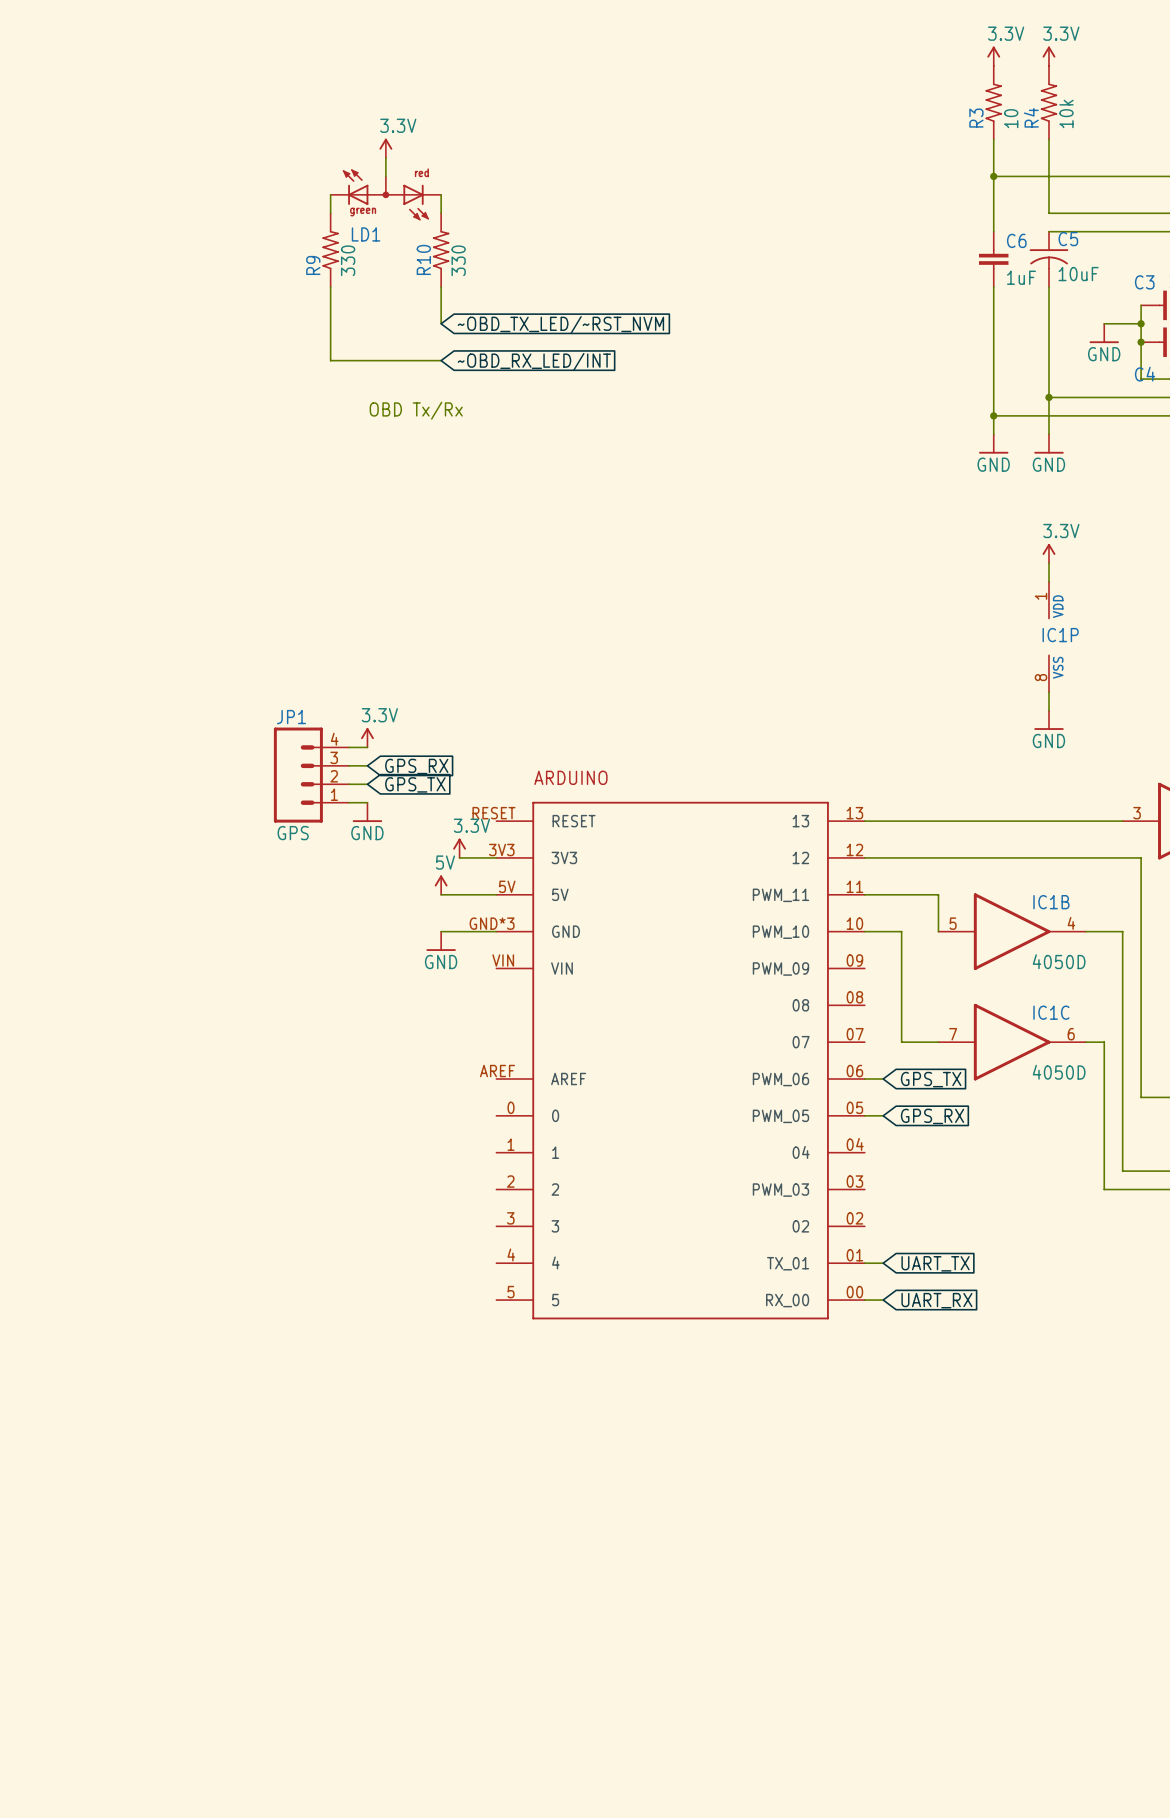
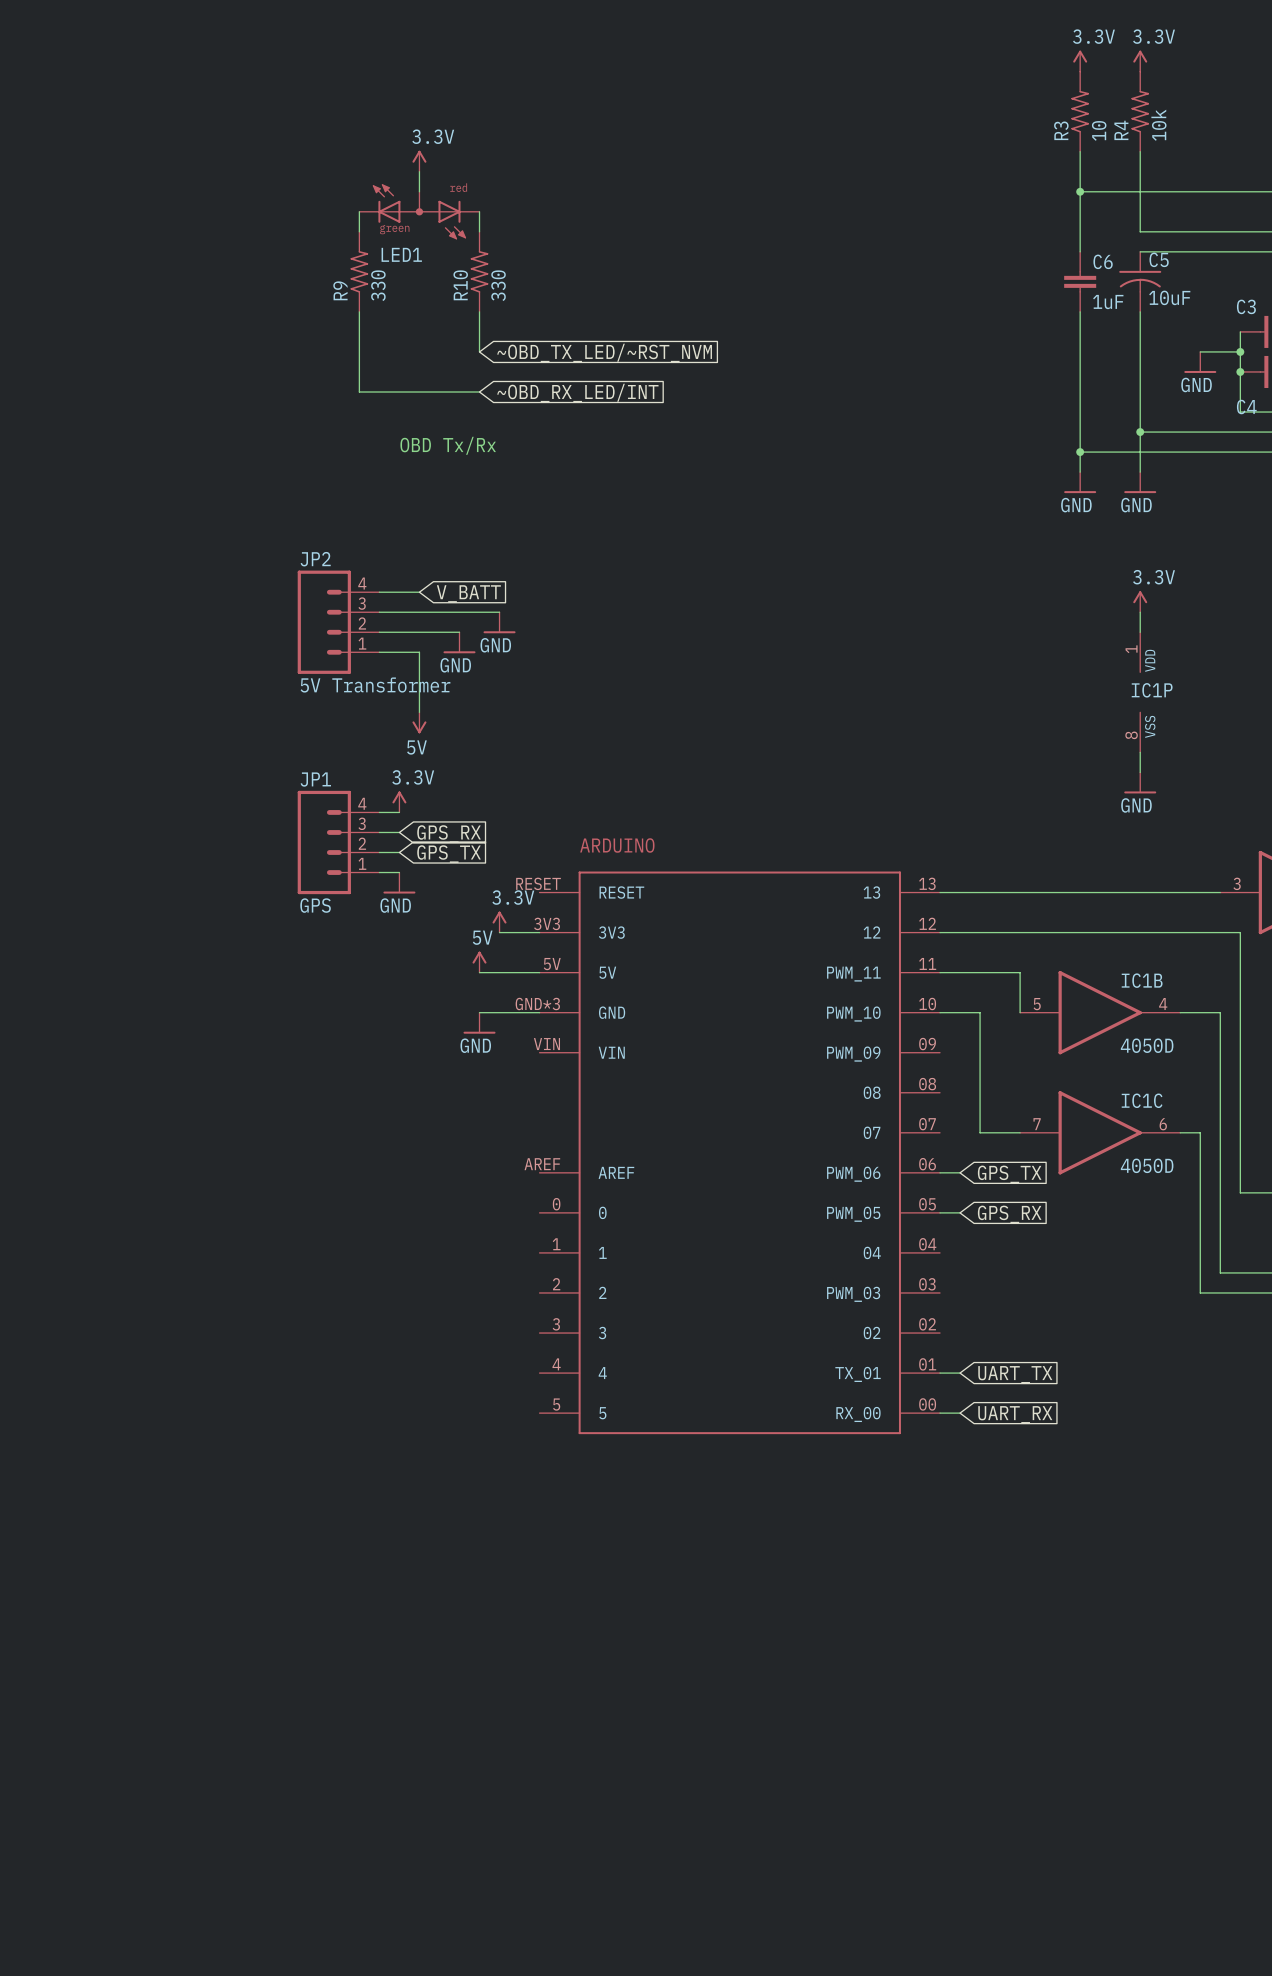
LD1 name: LD1 (366, 234) -> LED1 (401, 254)
wire: none -> (379, 592) (419, 592)
global label: none -> V_BATT (468, 593)
wire: none -> (379, 612) (499, 612)
JP2: none -> 5V Transformer (338, 622)
power symbol: none -> GND (499, 622)
wire: none -> (379, 632) (459, 632)
power symbol: none -> GND (459, 642)
wire: none -> (379, 652) (419, 652) (419, 712)
power symbol: none -> 5V (419, 722)

